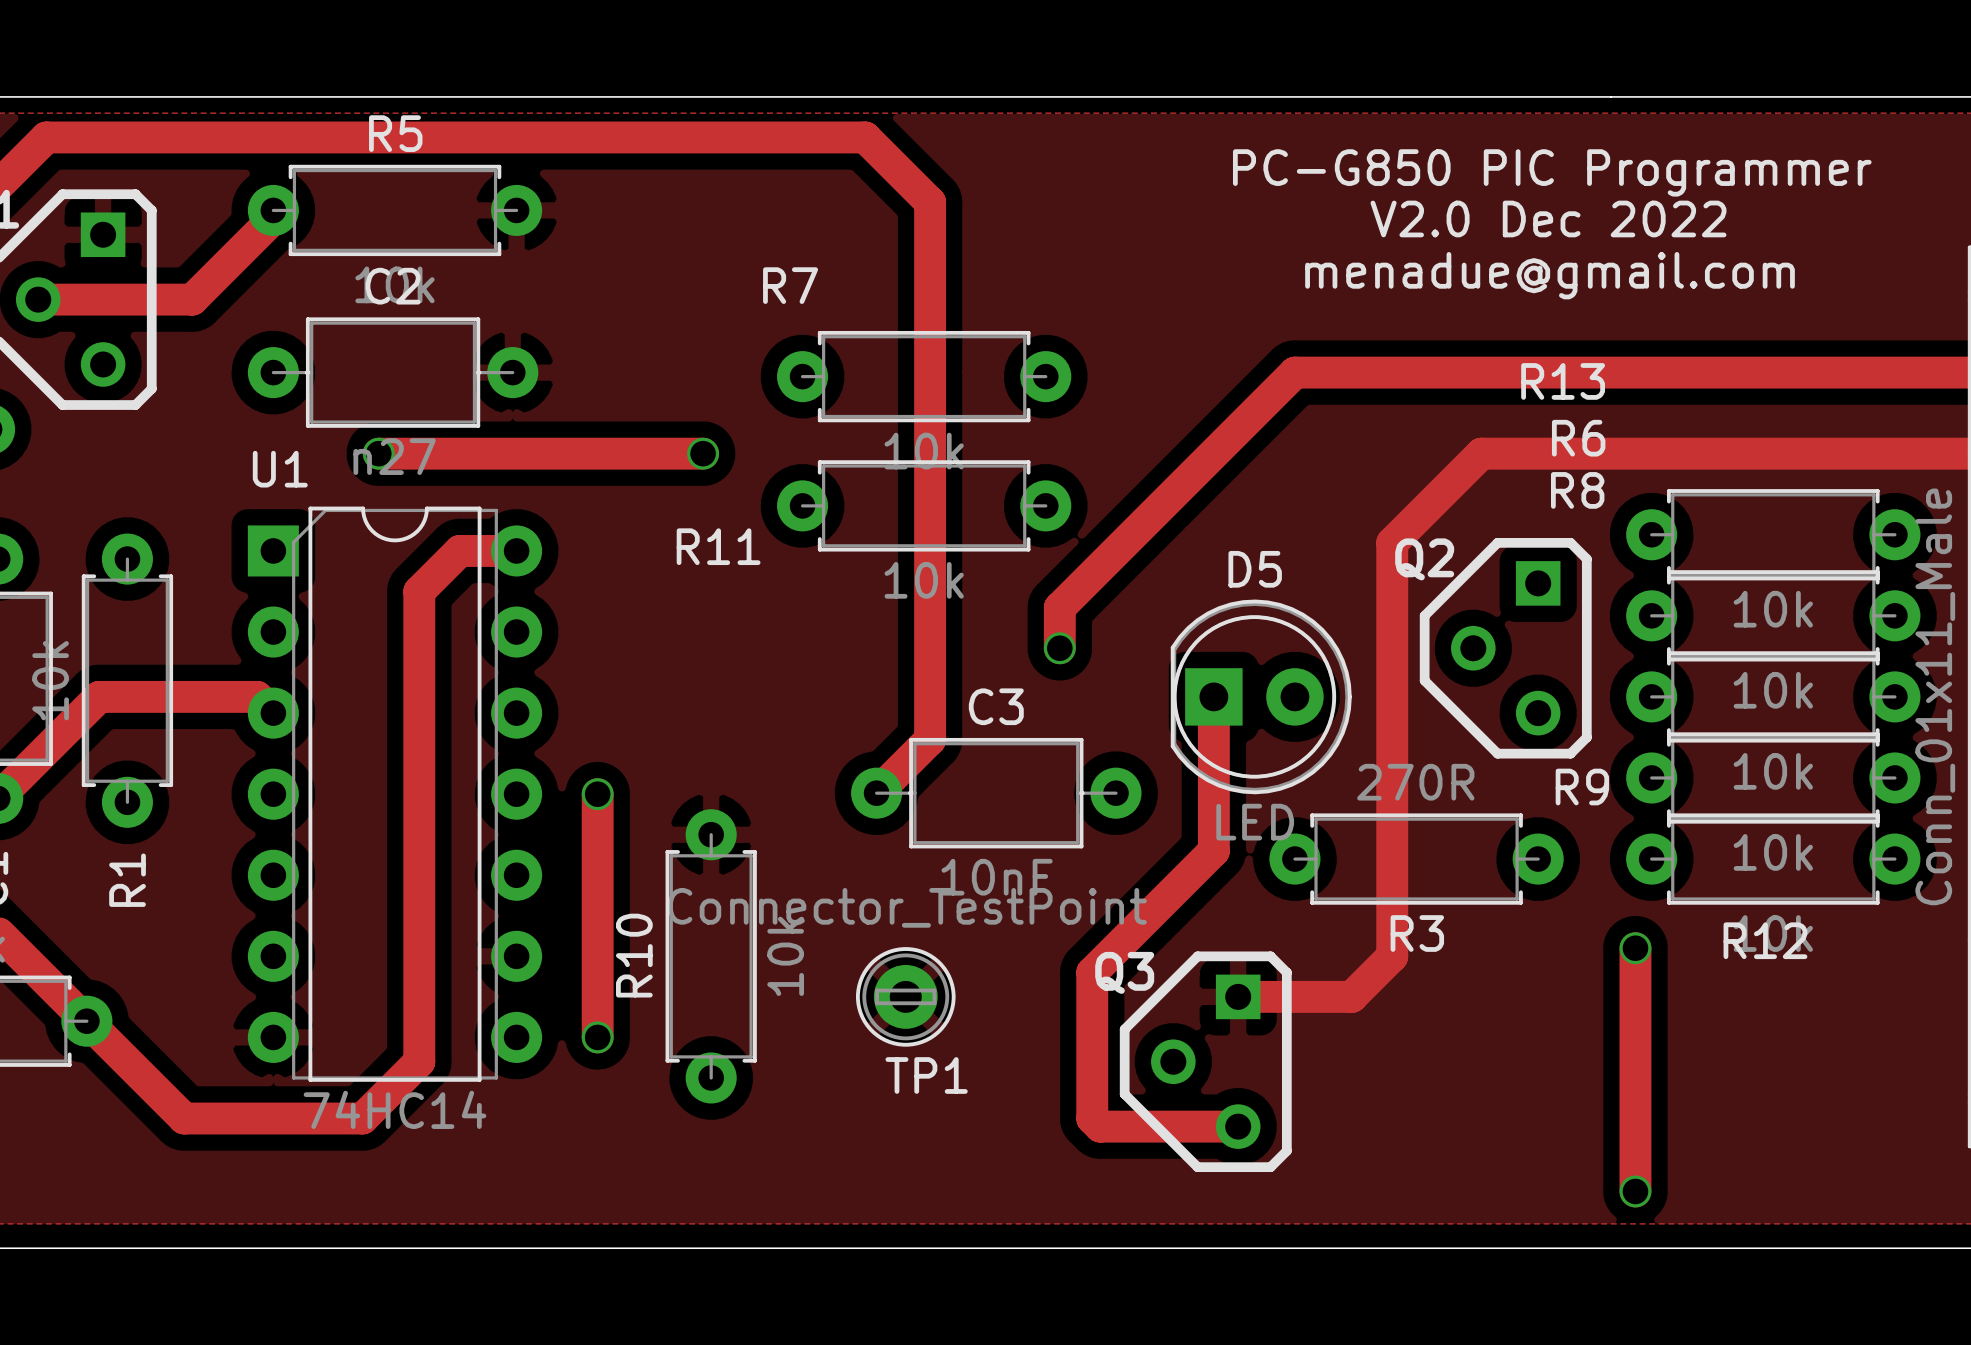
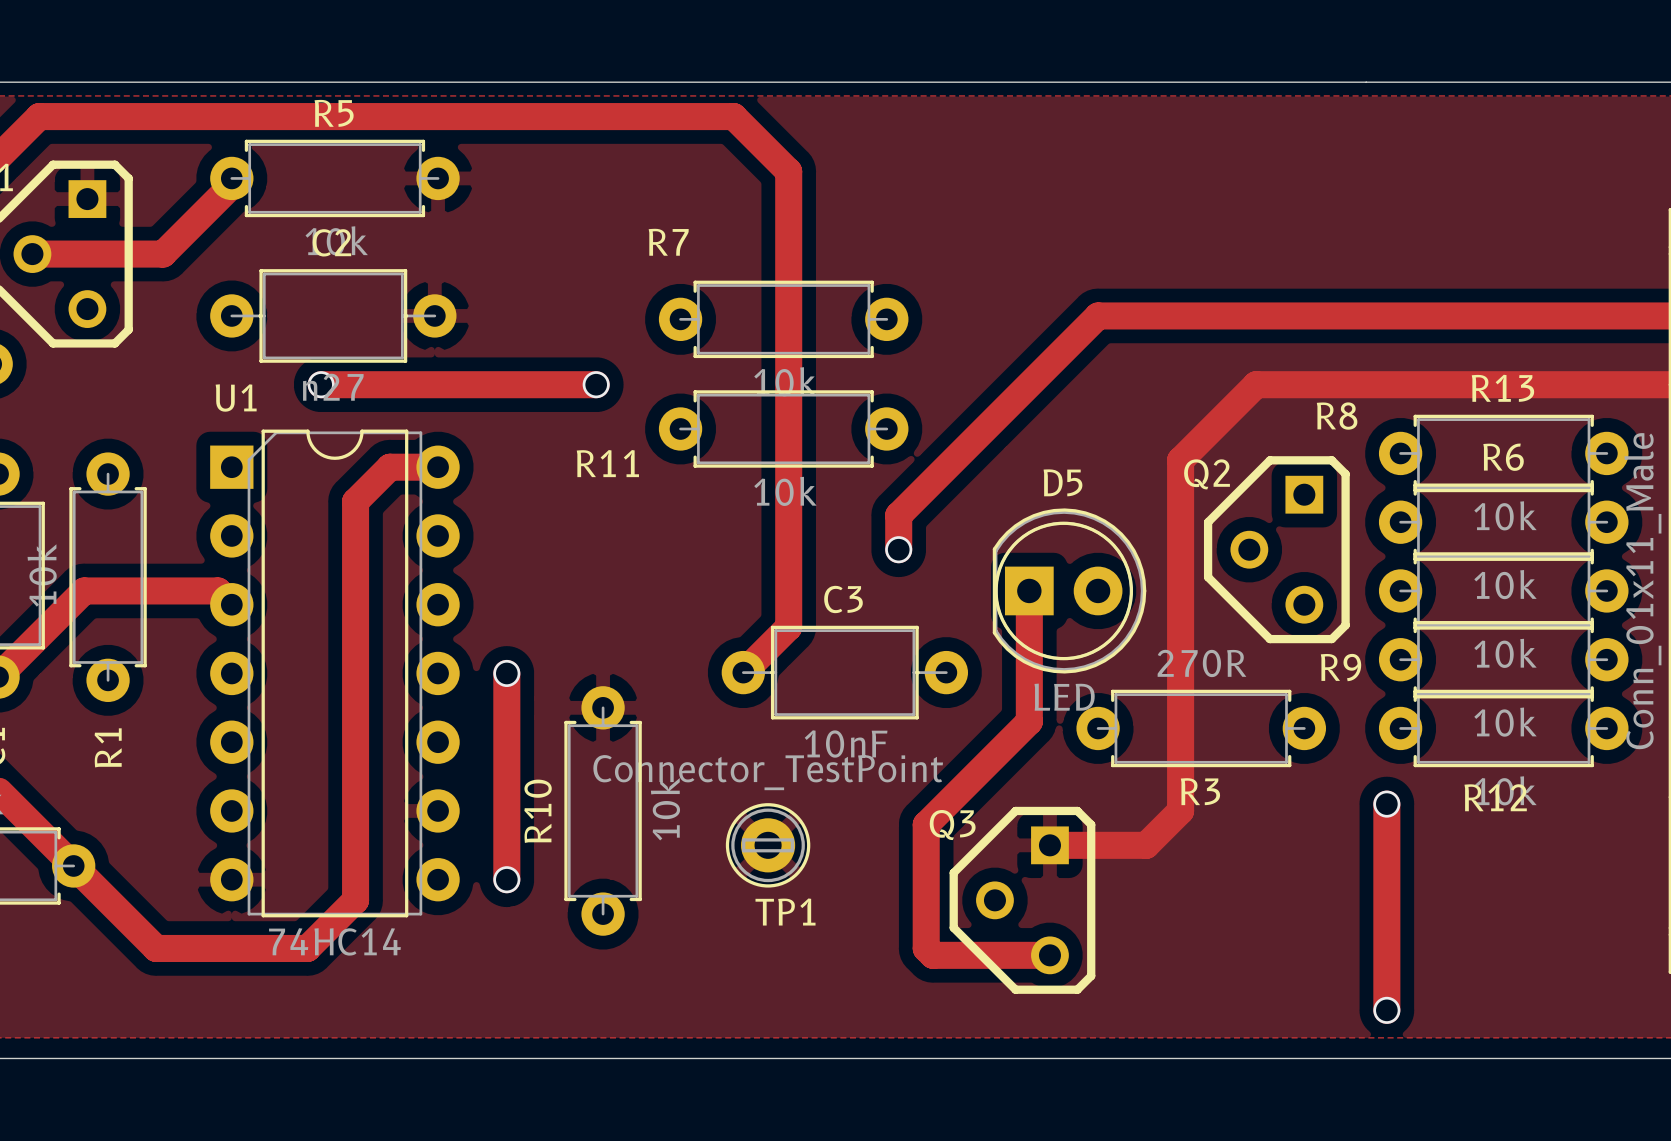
text: PC-G850 PIC Programmer (1552, 172) -> none
text: V2.0 Dec 2022 (1548, 218) -> none
text: menadue@gmail.com (1550, 275) -> none
R13 name position: R13 (1563, 381) -> R13 (1502, 388)
R6 name position: R6 (1578, 438) -> R6 (1503, 457)

